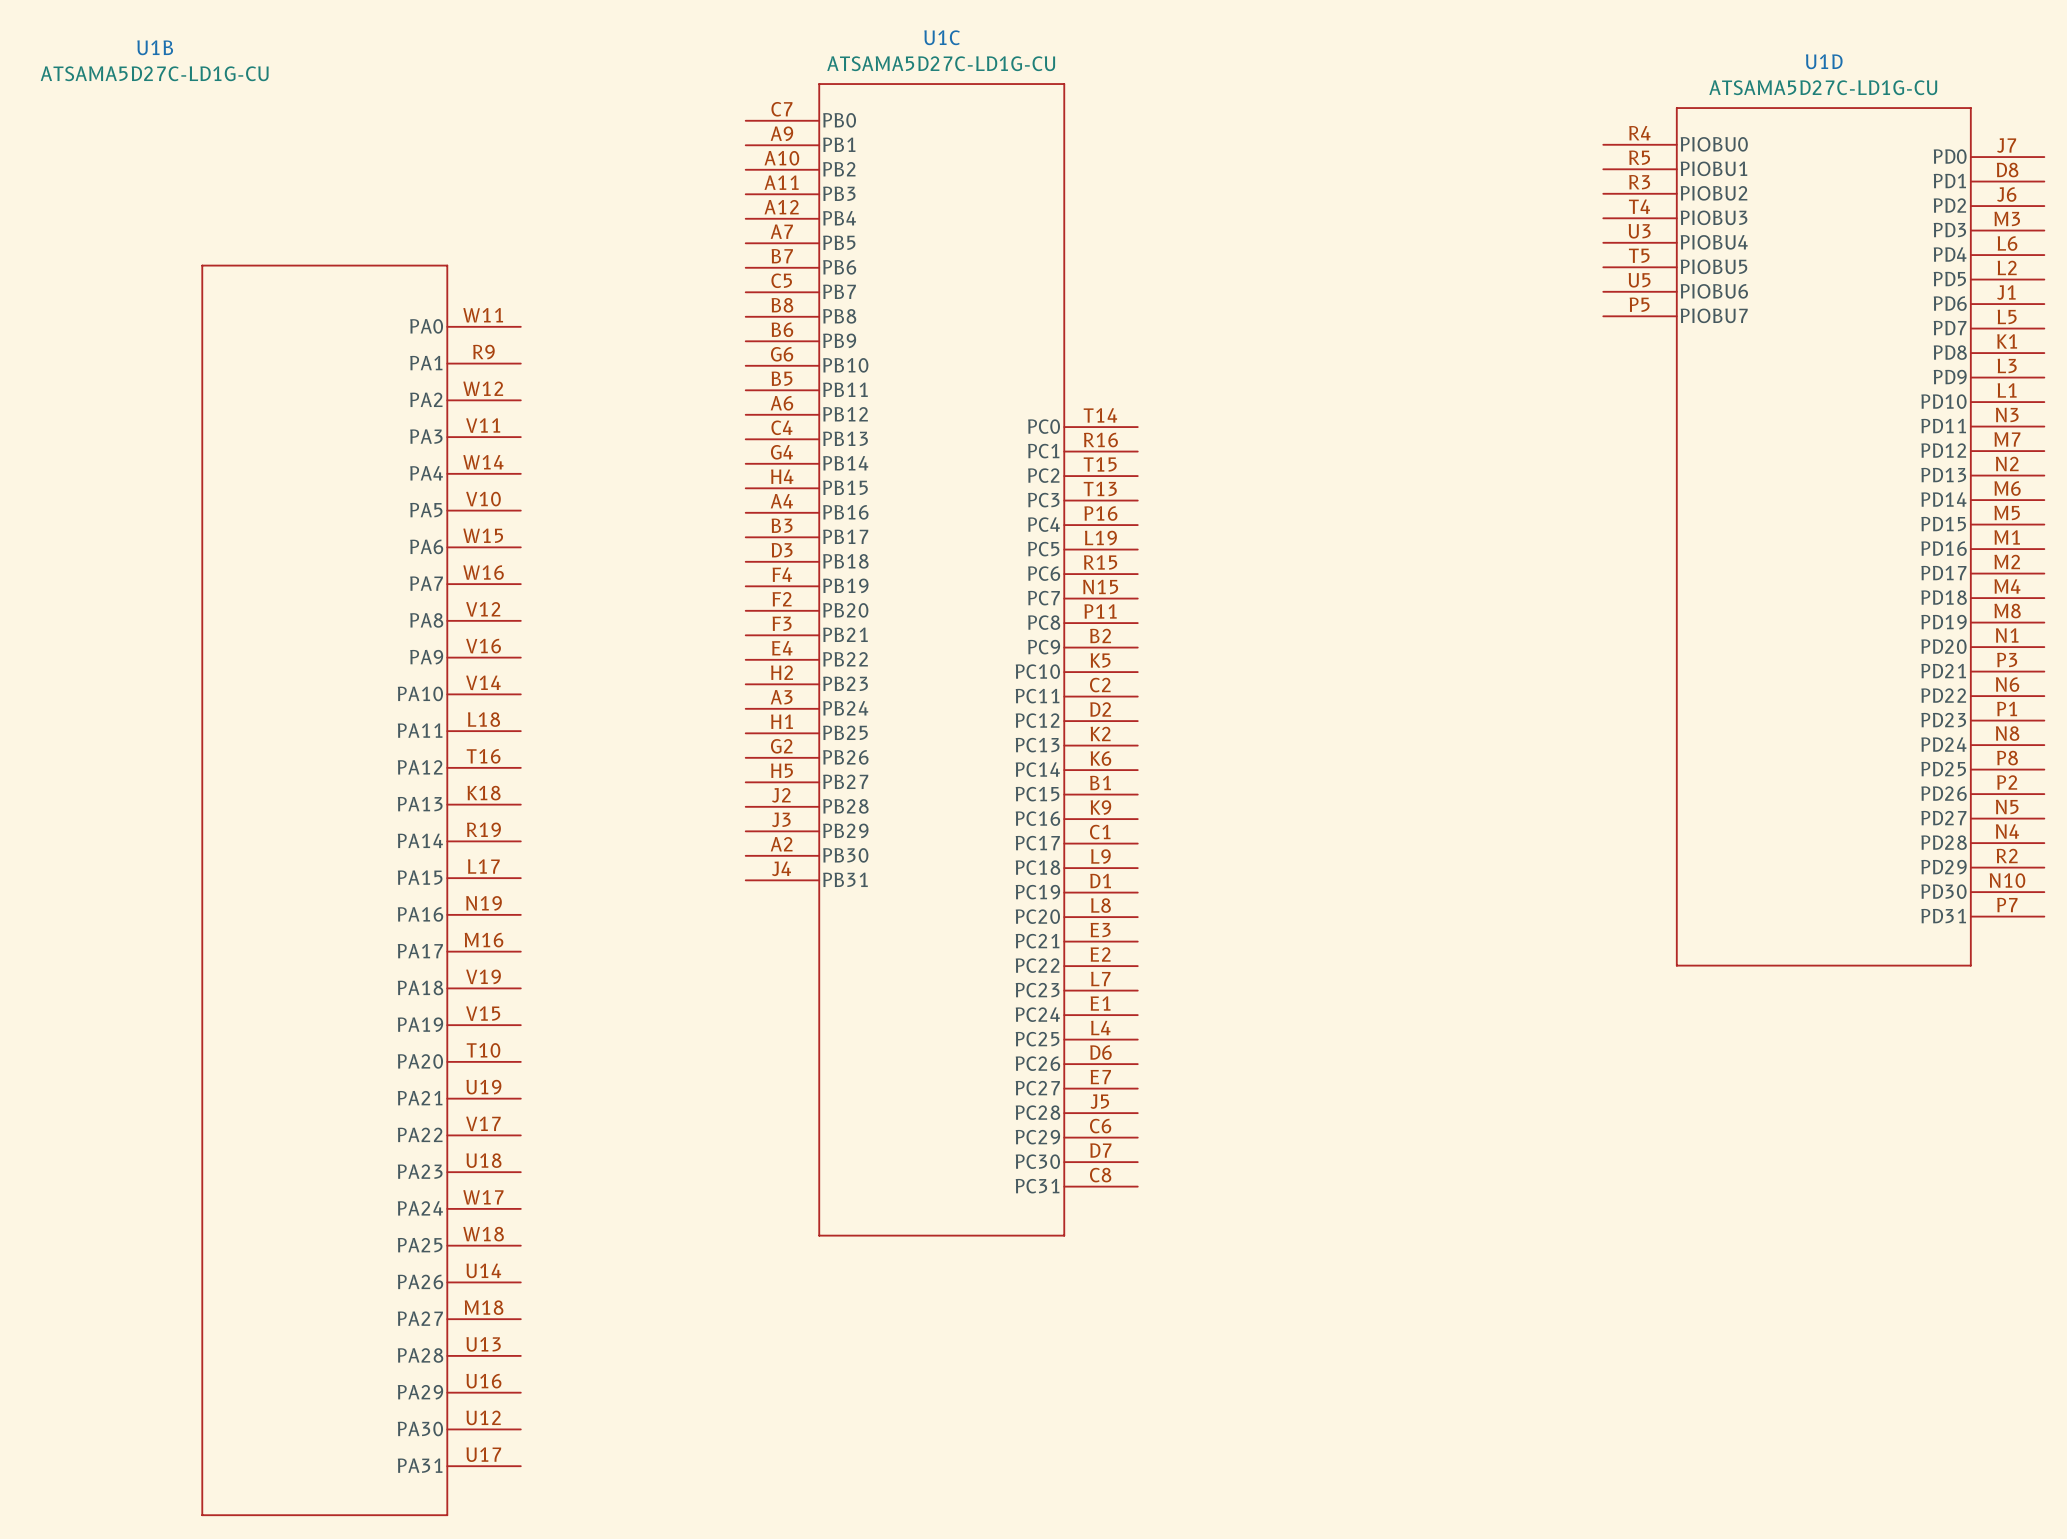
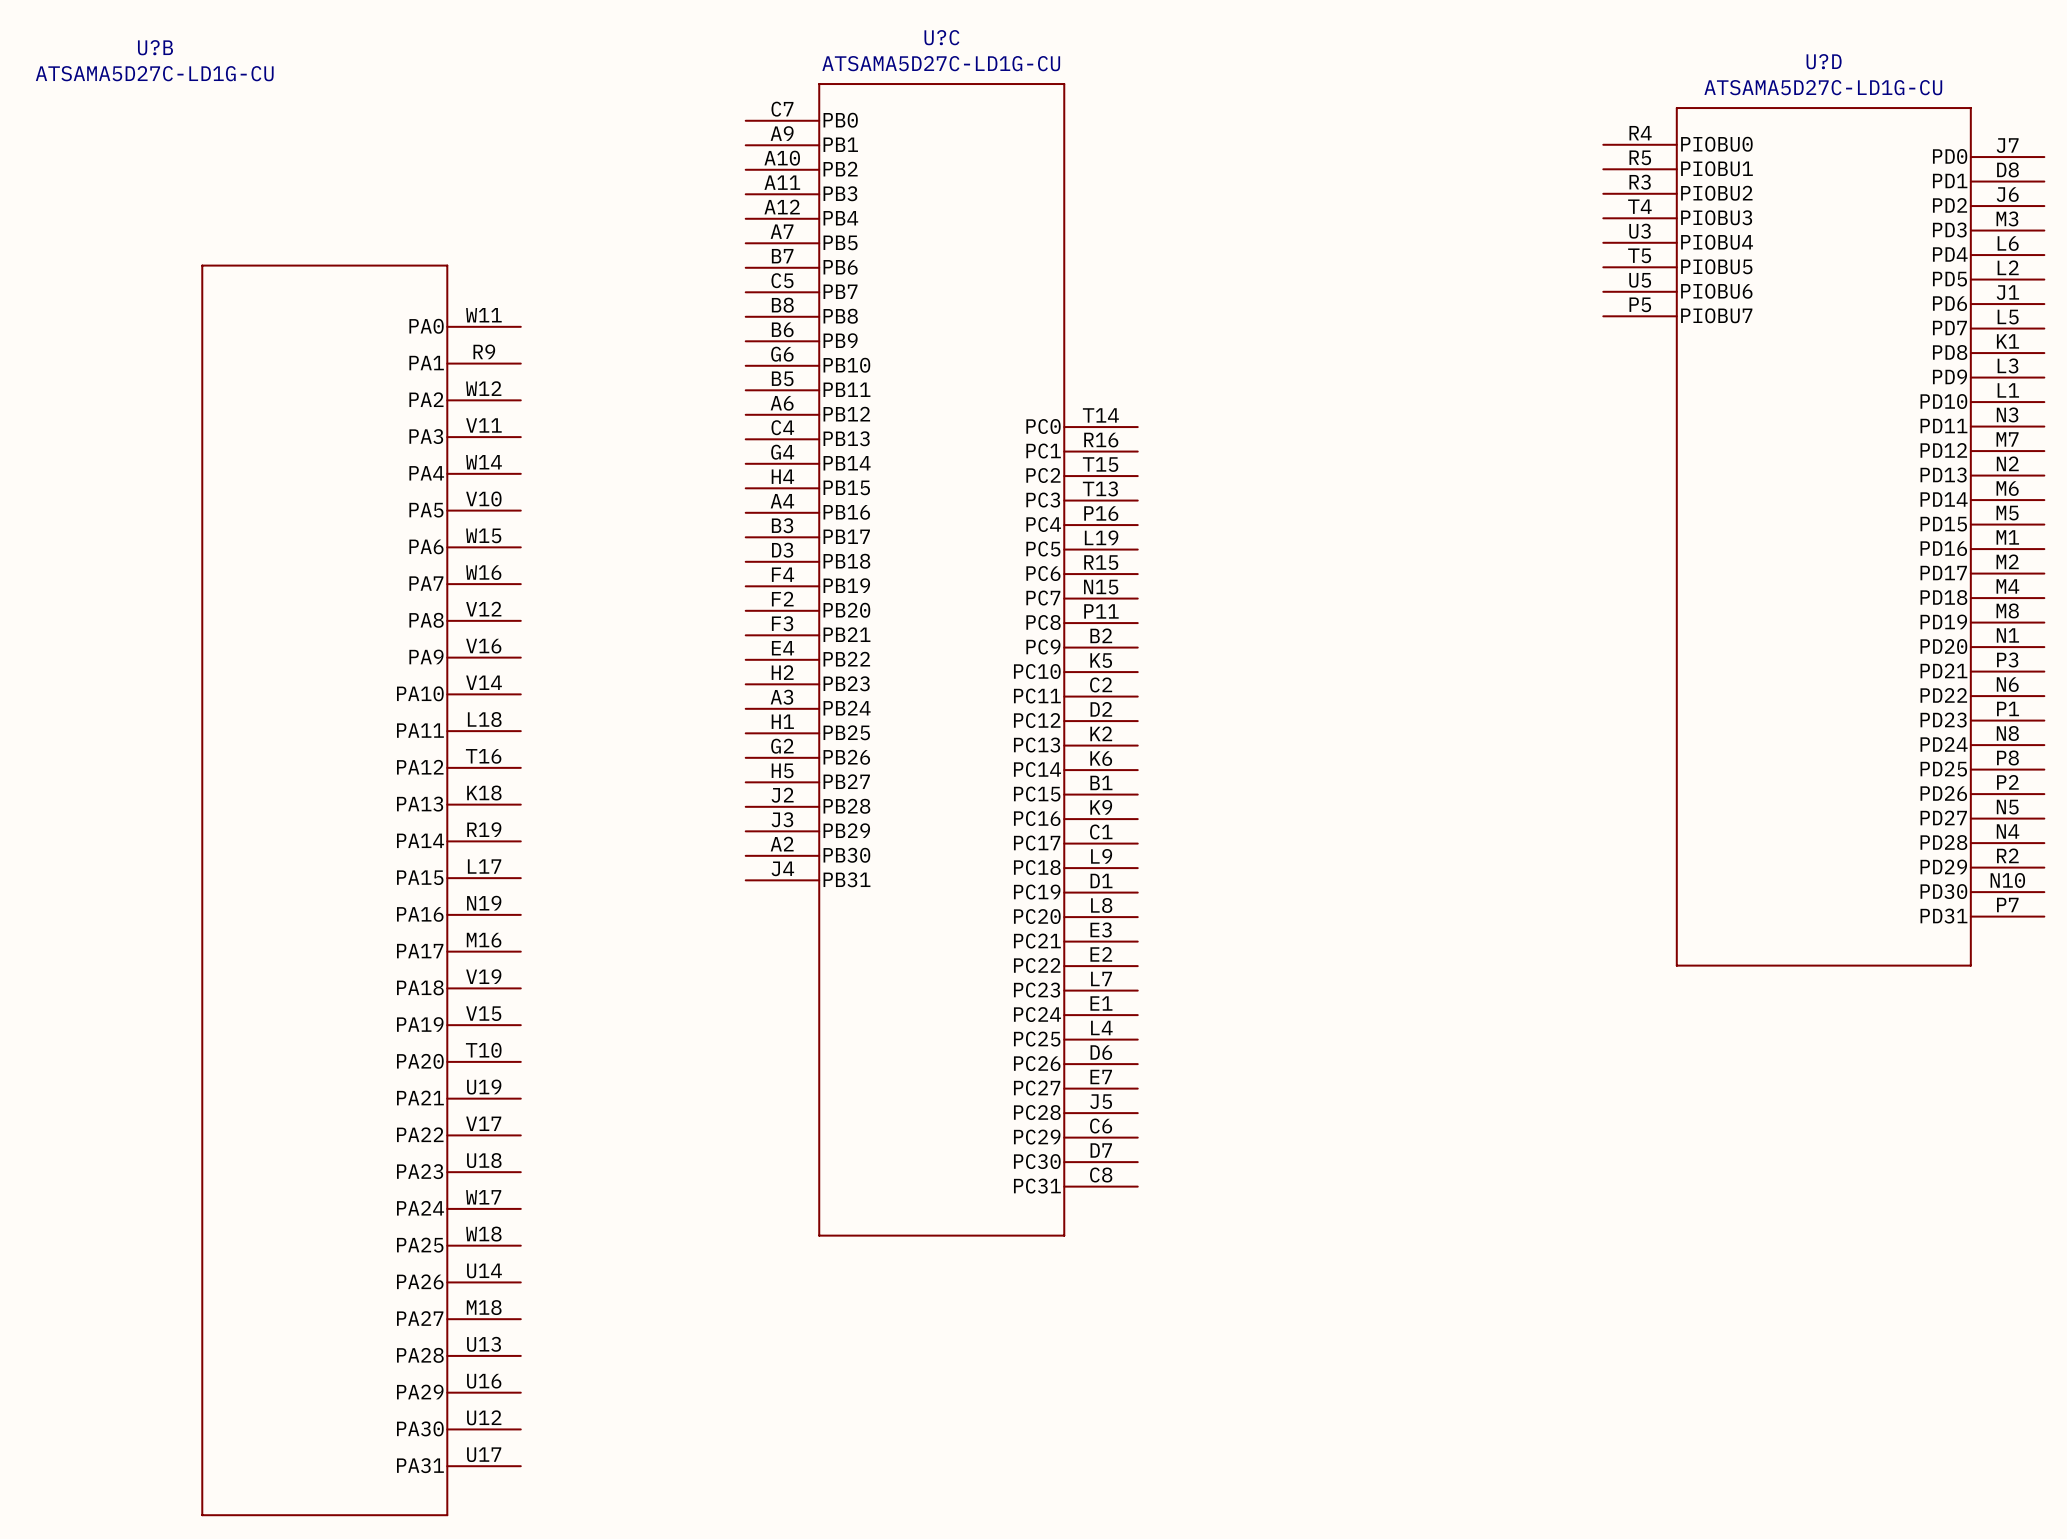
U1C name: U1C (942, 37) -> U?C (941, 37)
U1B name: U1B (155, 47) -> U?B (155, 47)
U1D name: U1D (1824, 61) -> U?D (1824, 61)

